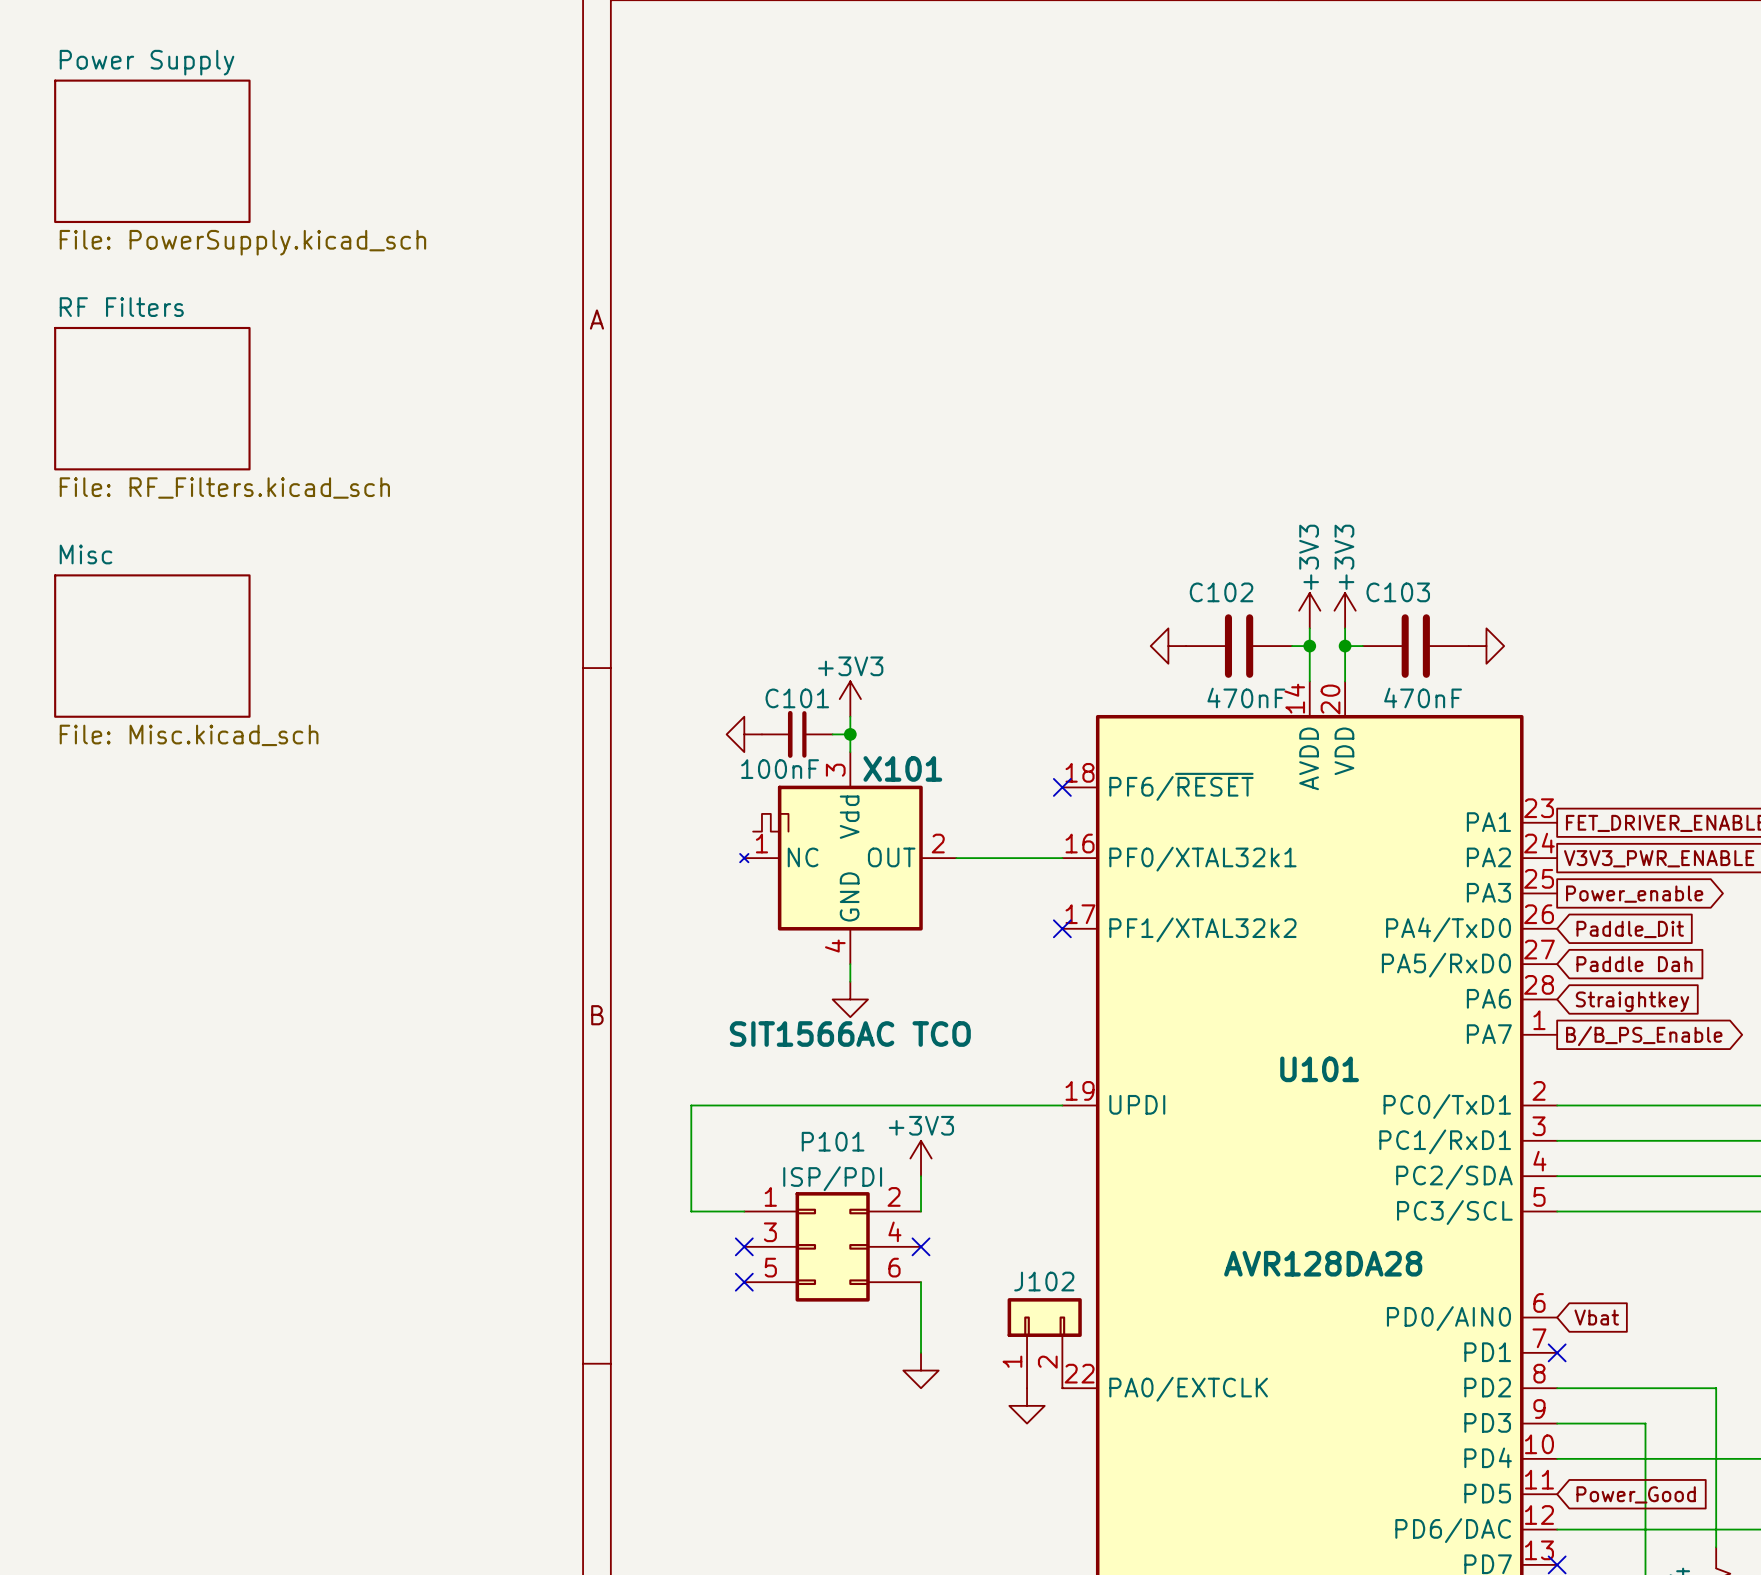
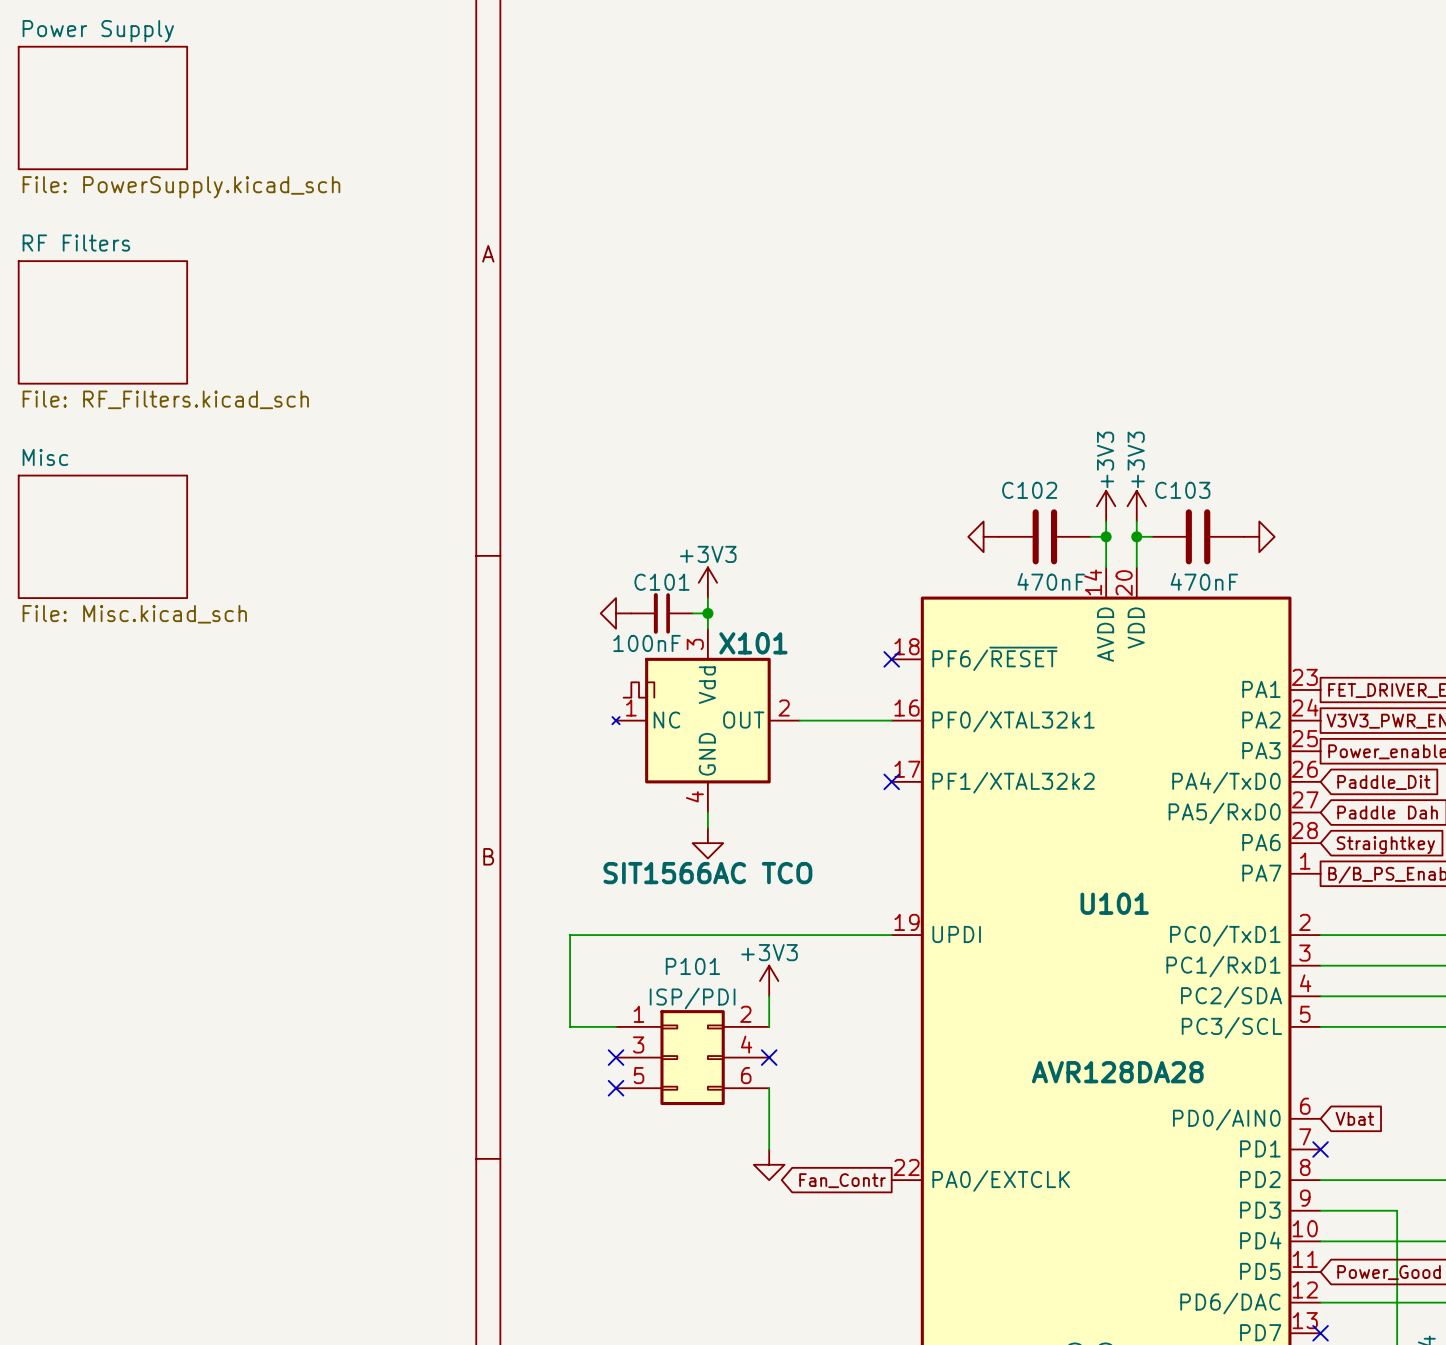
J102: (1044, 1343) -> none
global label: none -> Fan_Contr (842, 1180)
power symbol: (1027, 1405) -> none

